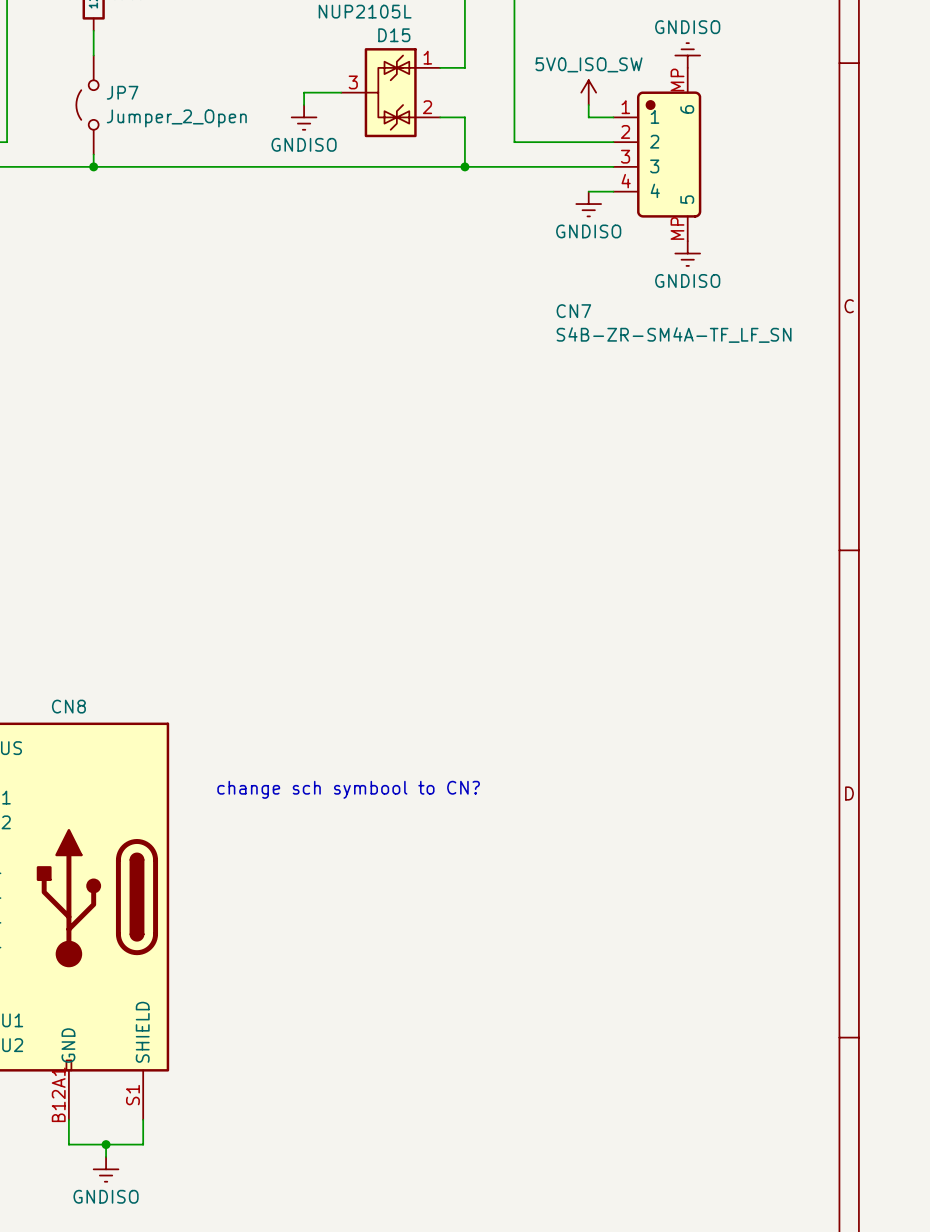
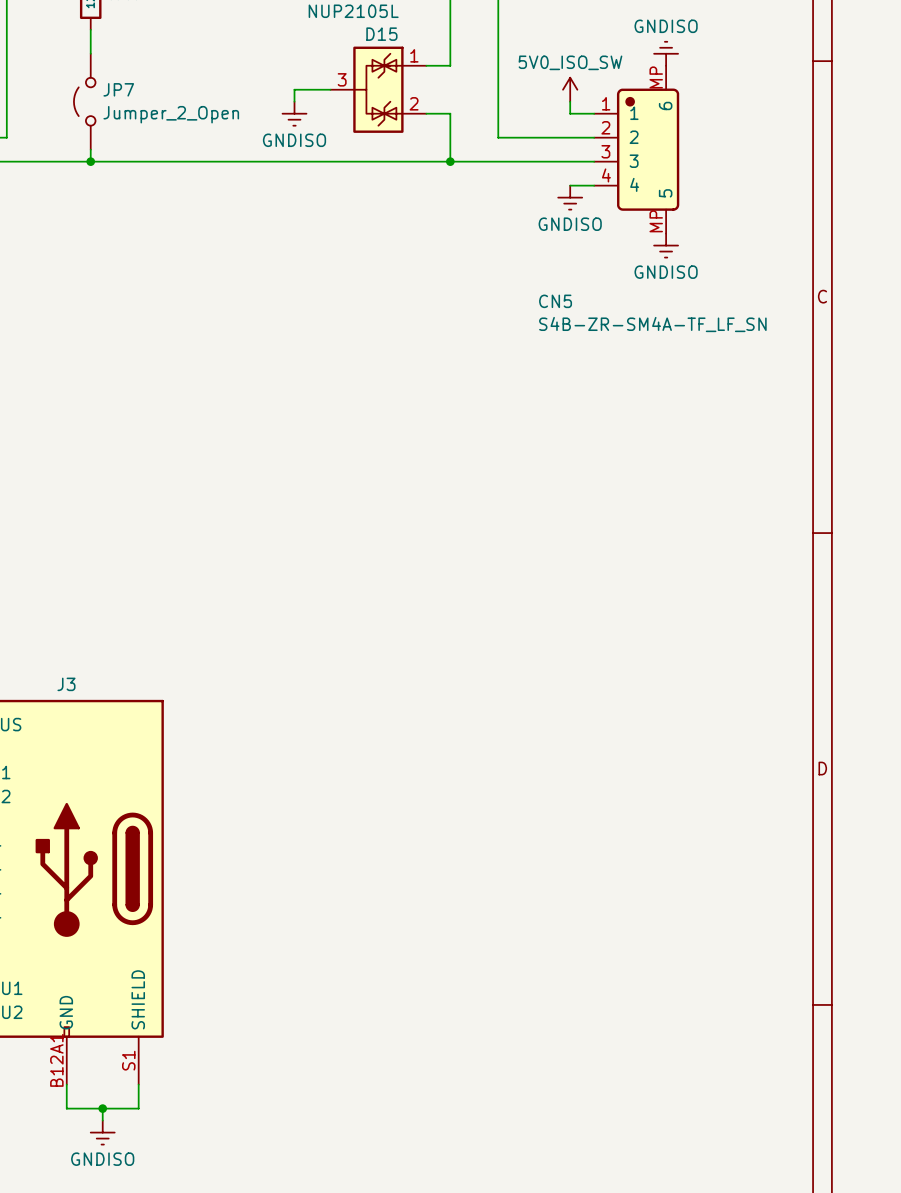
CN7 name: CN7 (573, 311) -> CN5 (555, 301)
CN8 name: CN8 (68, 706) -> J3 (66, 684)
text: change sch symbool to CN? (348, 789) -> none

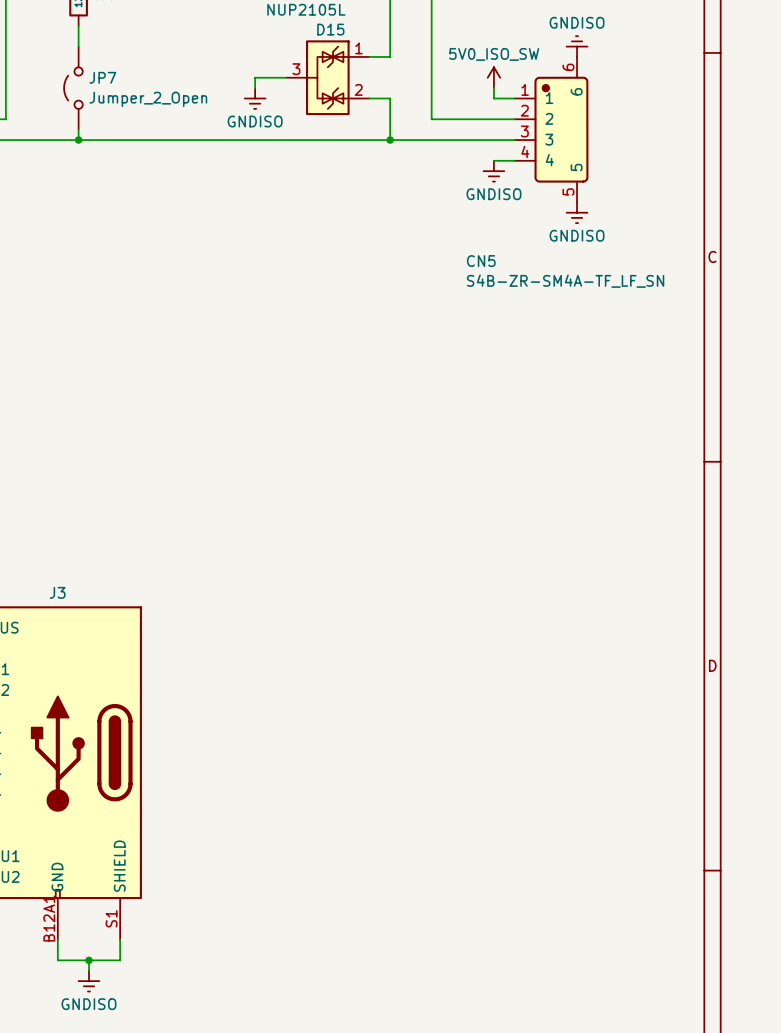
CN5 pin number: MP (656, 77) -> 6 (568, 67)
CN5 pin number: MP (656, 221) -> 5 (568, 191)

